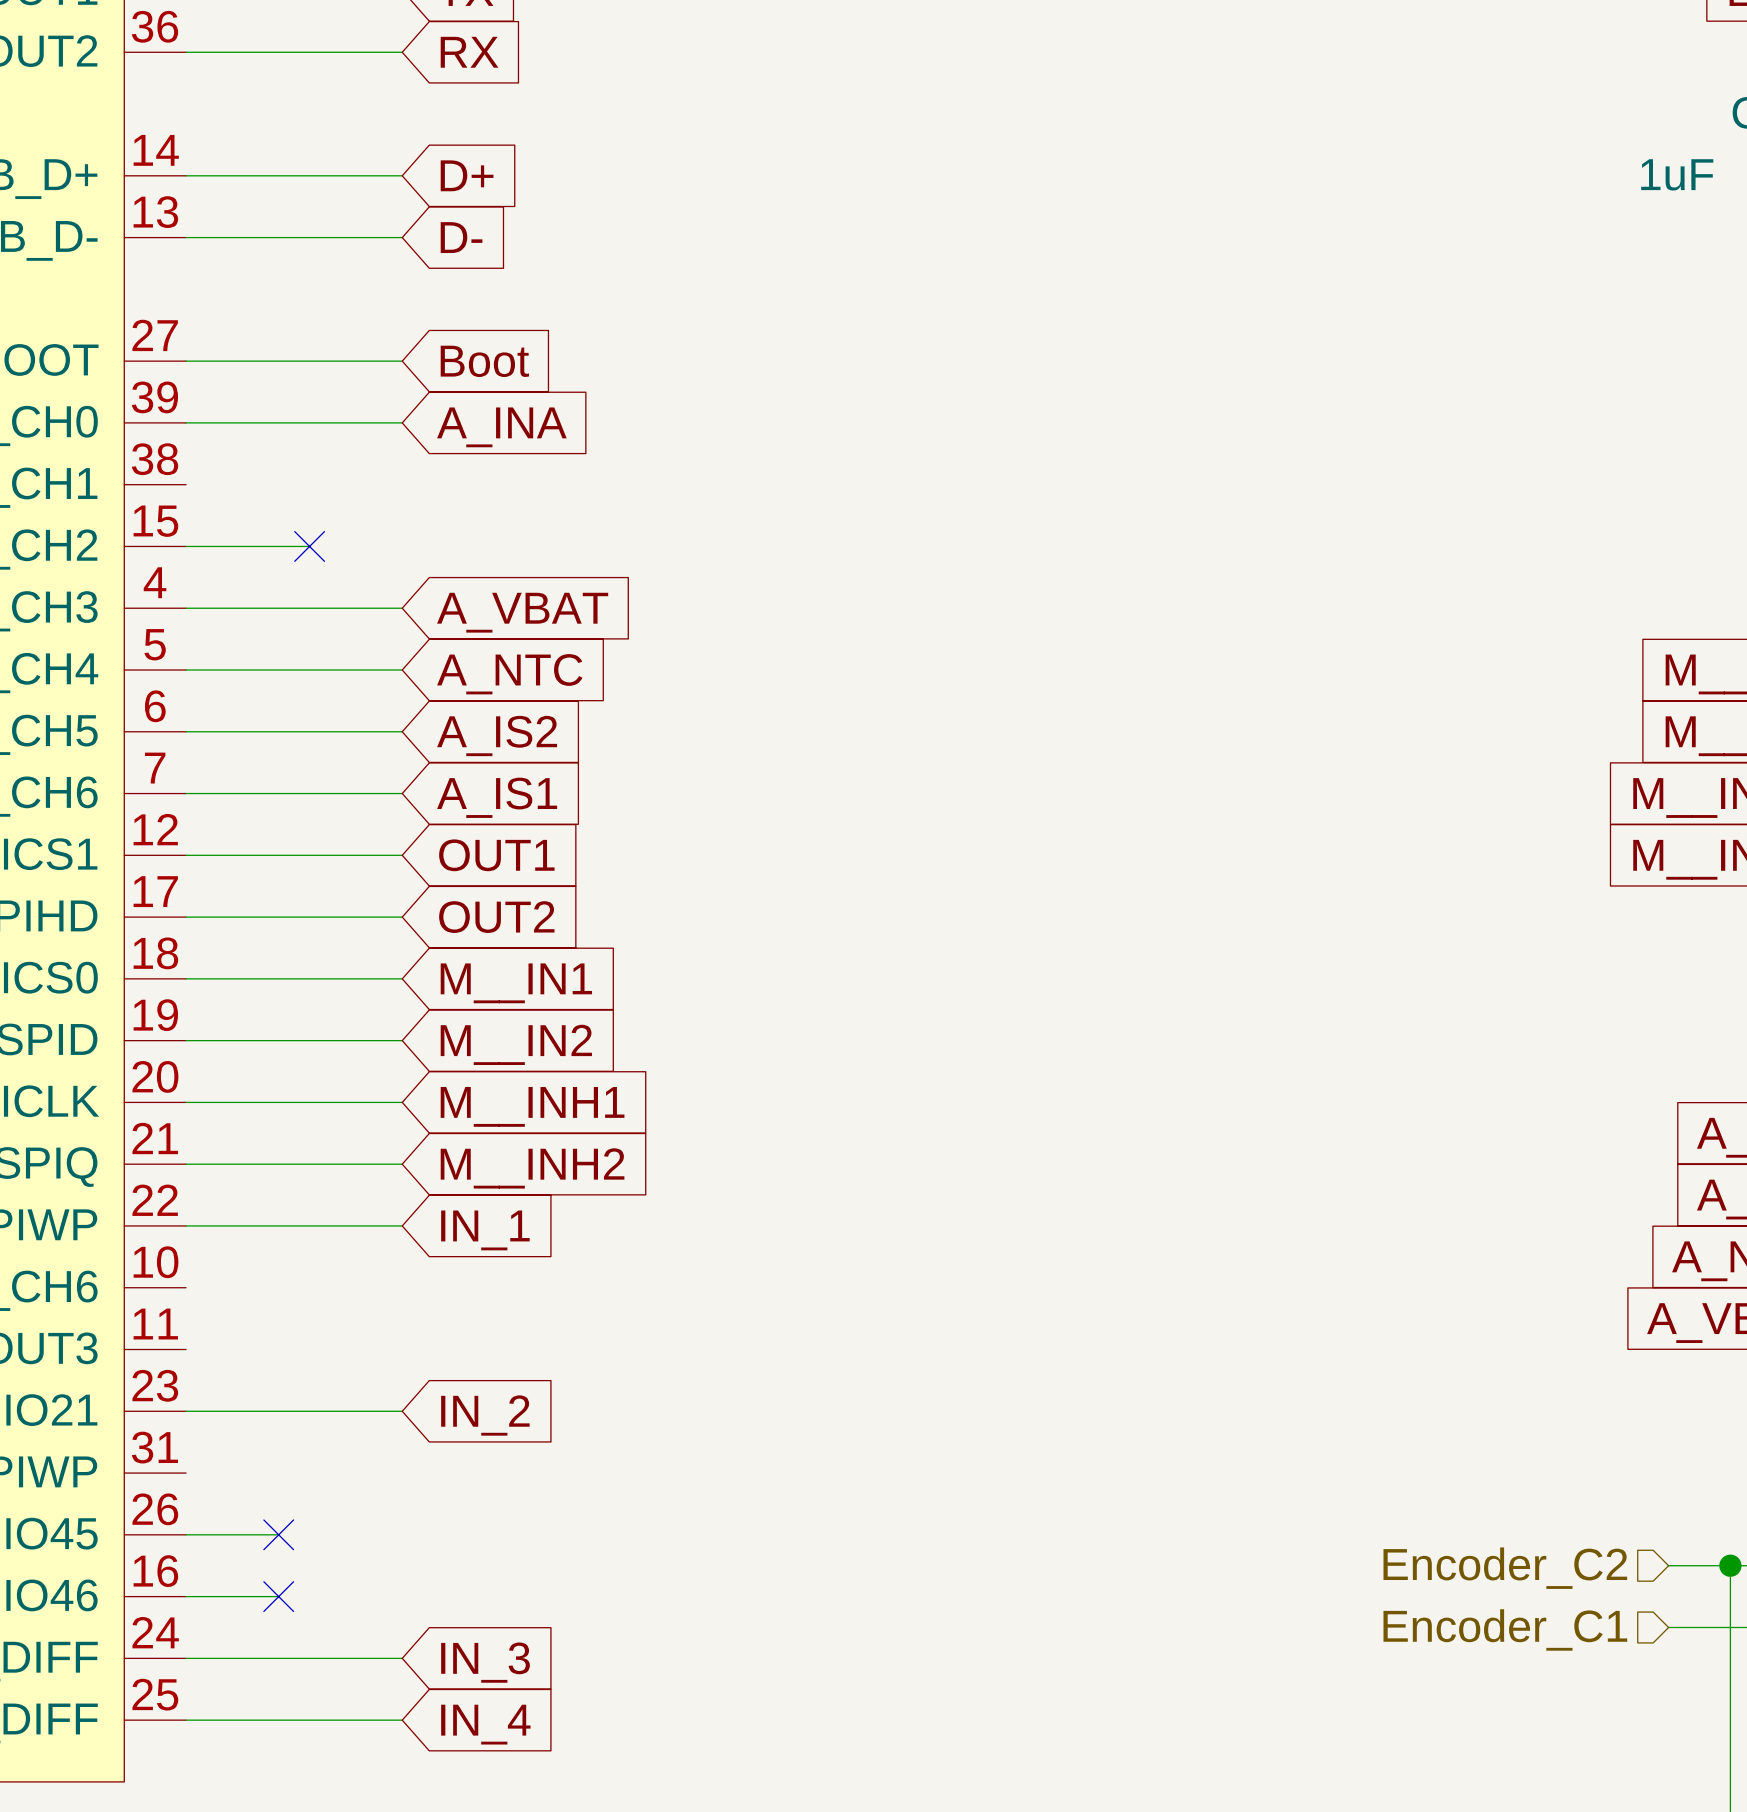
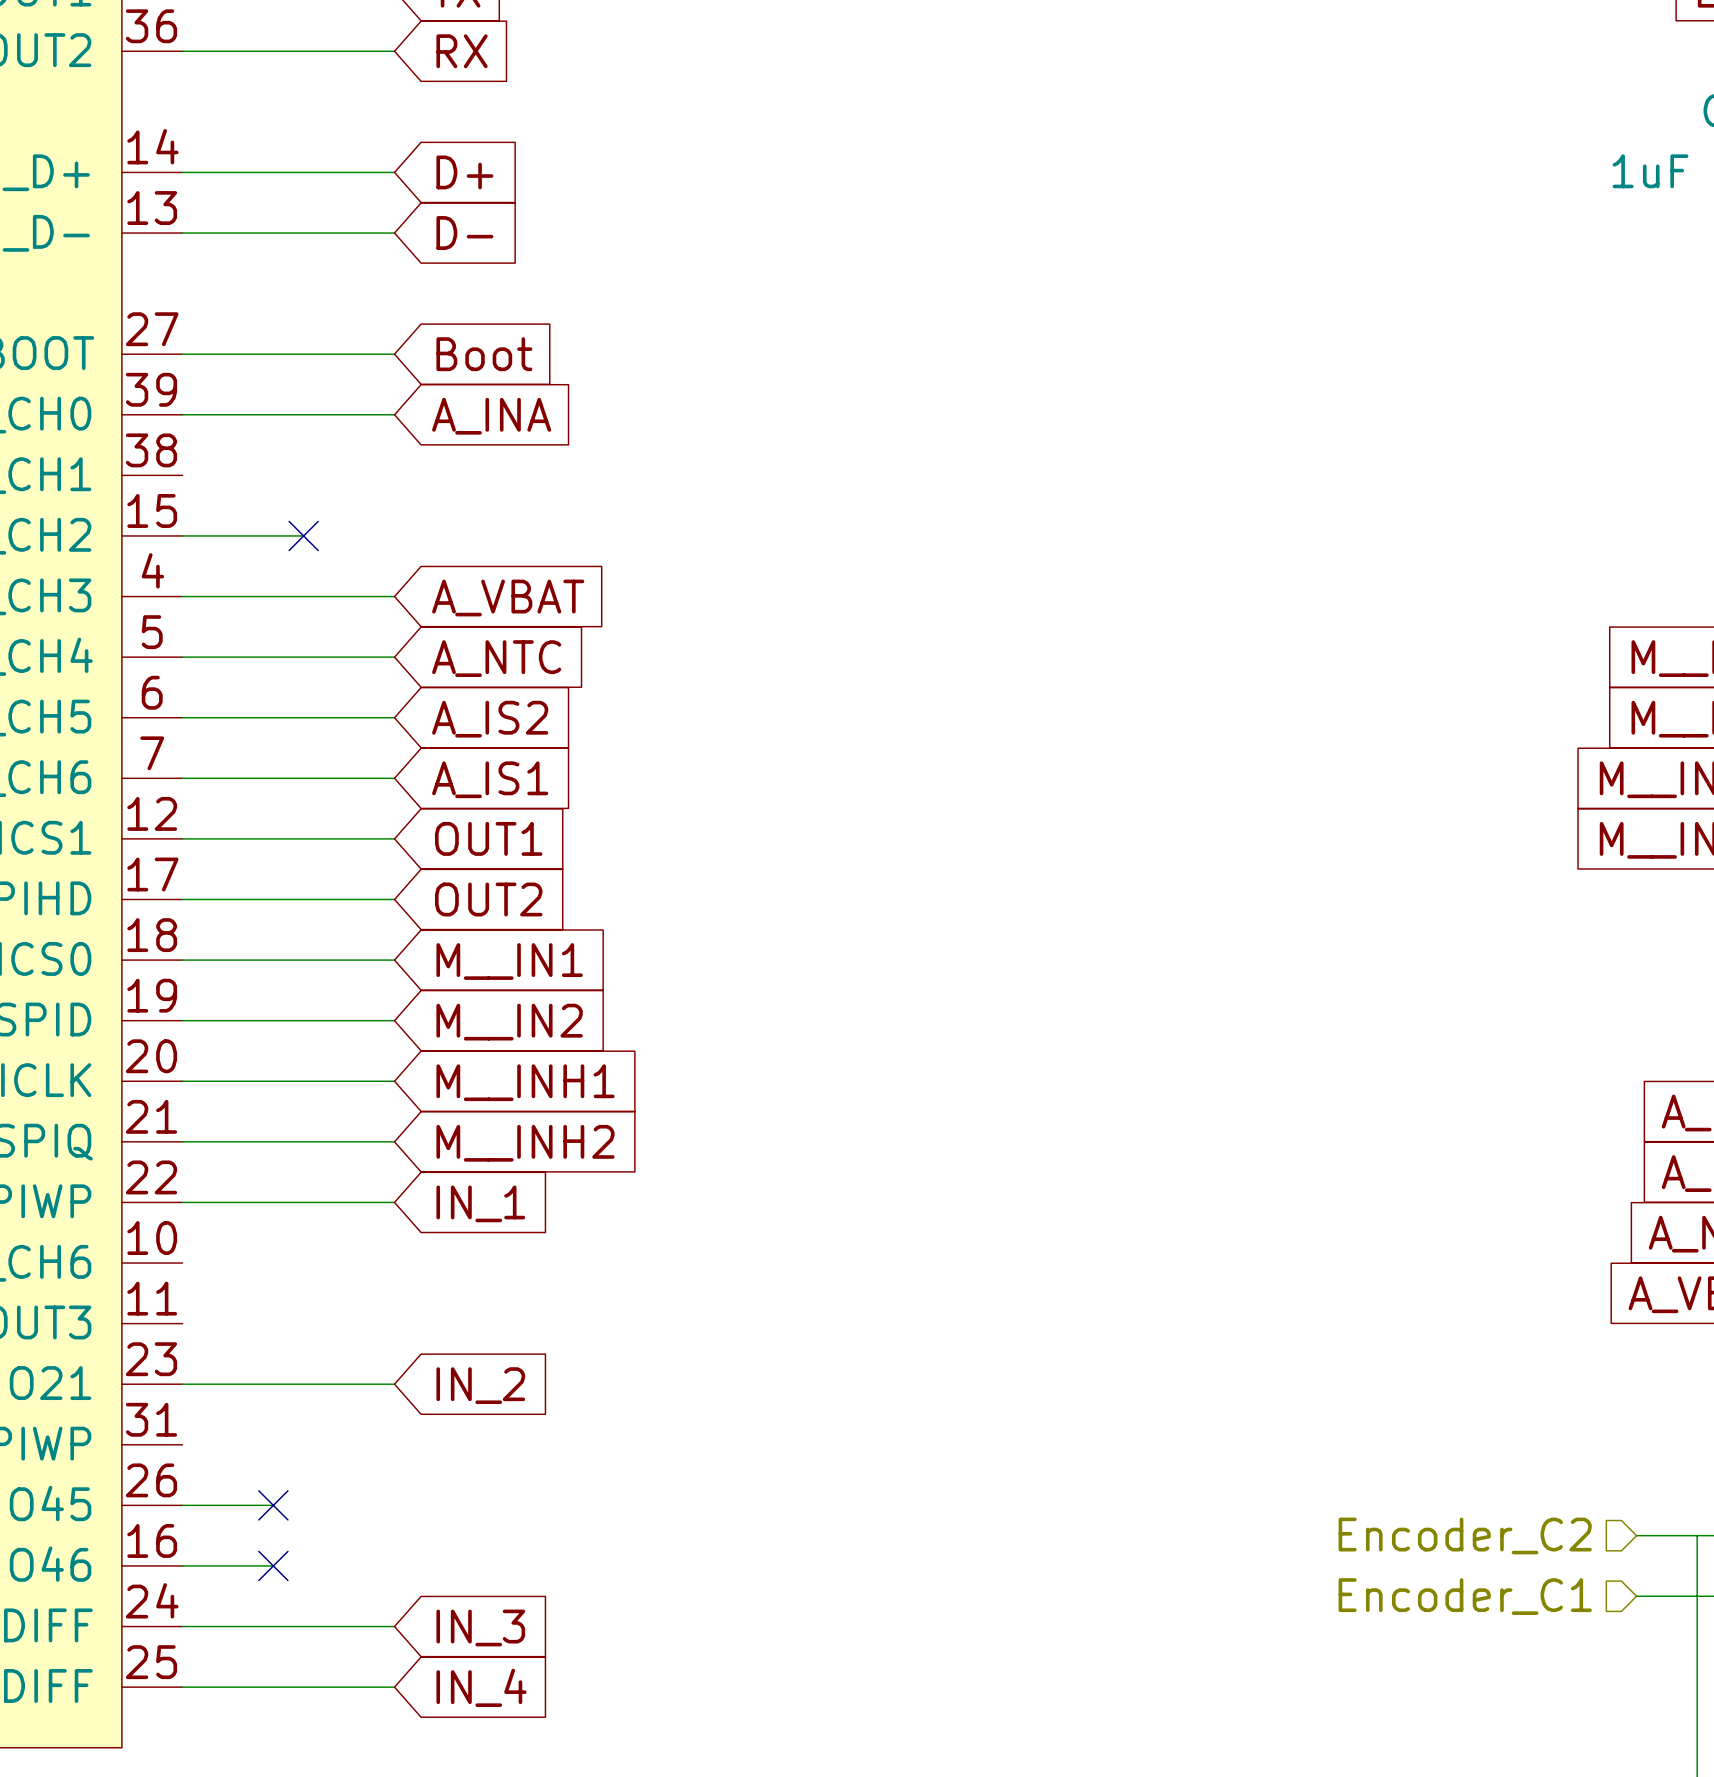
junction: (1730, 1565) -> none

